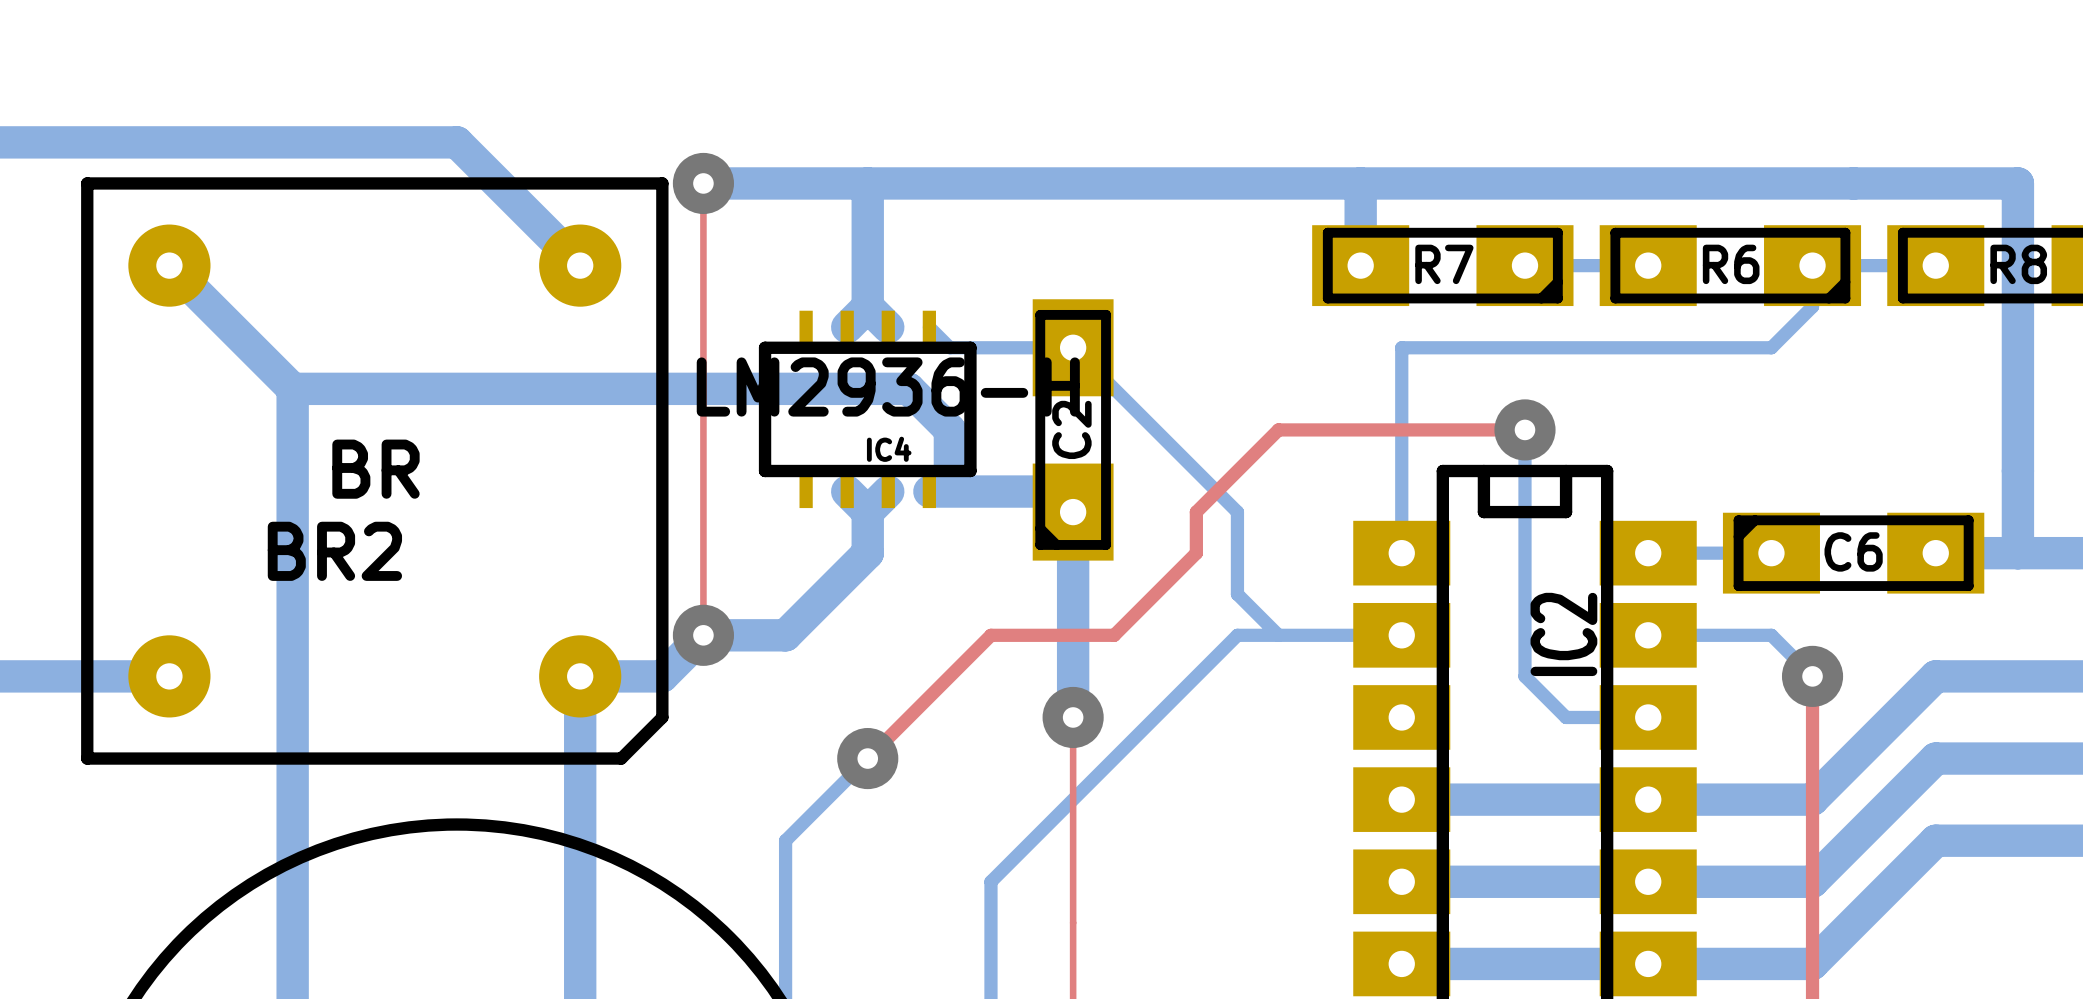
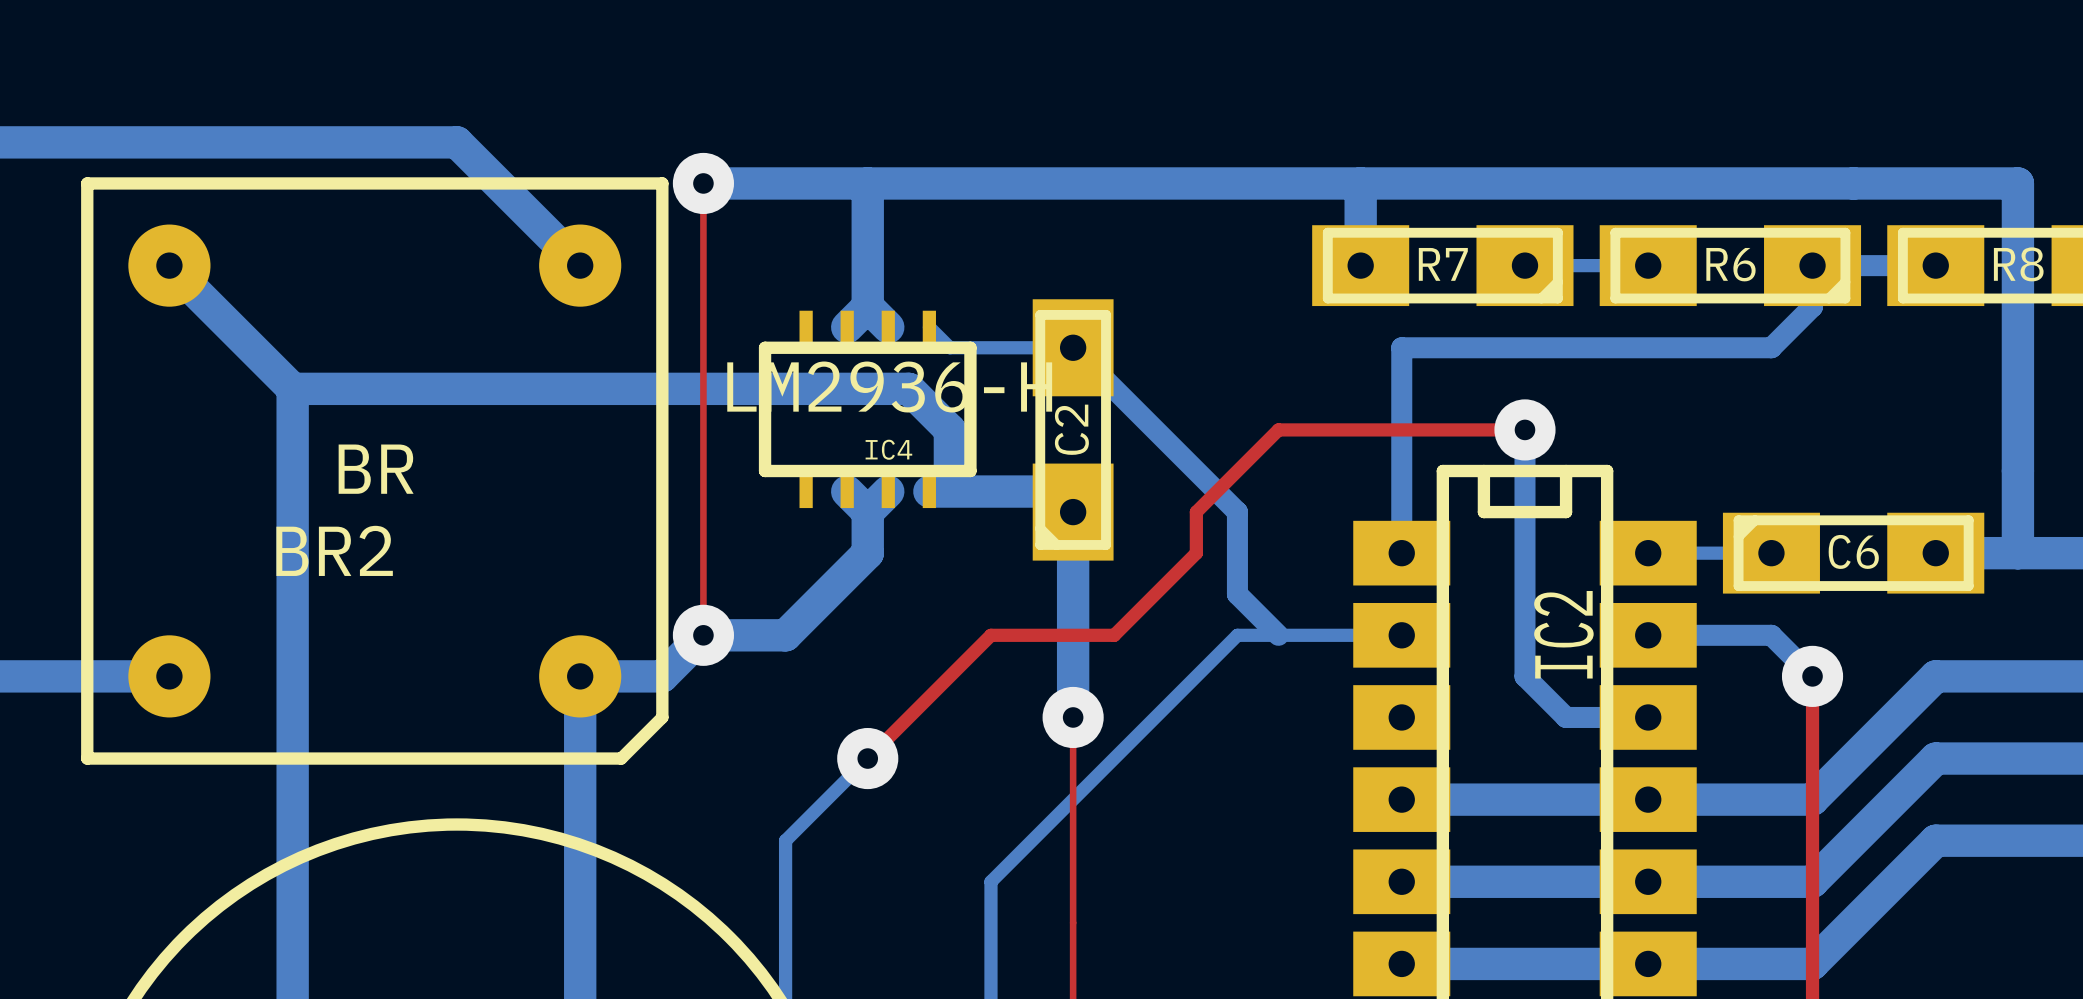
bottom track width: thin (1935, 265) (1812, 265) (1812, 306) (1771, 347) (1401, 347) (1401, 553) -> thick (1935, 265) (1812, 265) (1812, 306) (1771, 347) (1401, 347) (1401, 553)
bottom track width: thin (1073, 347) (1237, 512) (1237, 594) (1278, 635) -> thick (1073, 347) (1237, 512) (1237, 594) (1278, 635)
bottom track width: thin (1524, 429) (1524, 676) (1566, 717) (1648, 717) -> thick (1524, 429) (1524, 676) (1566, 717) (1648, 717)
bottom track width: thin (1648, 635) (1771, 635) (1812, 676) -> thick (1648, 635) (1771, 635) (1812, 676)

